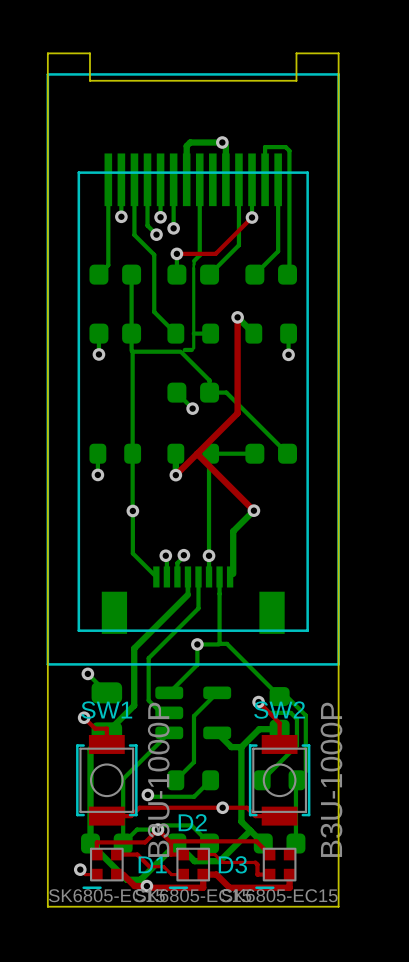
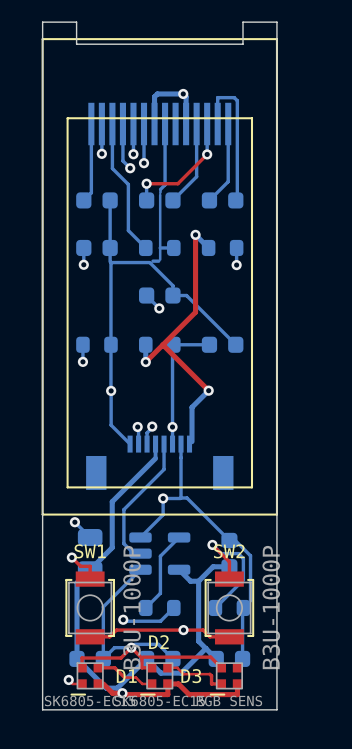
D3 value: SK6805-EC15 (279, 895) -> RGB SENS (229, 700)

